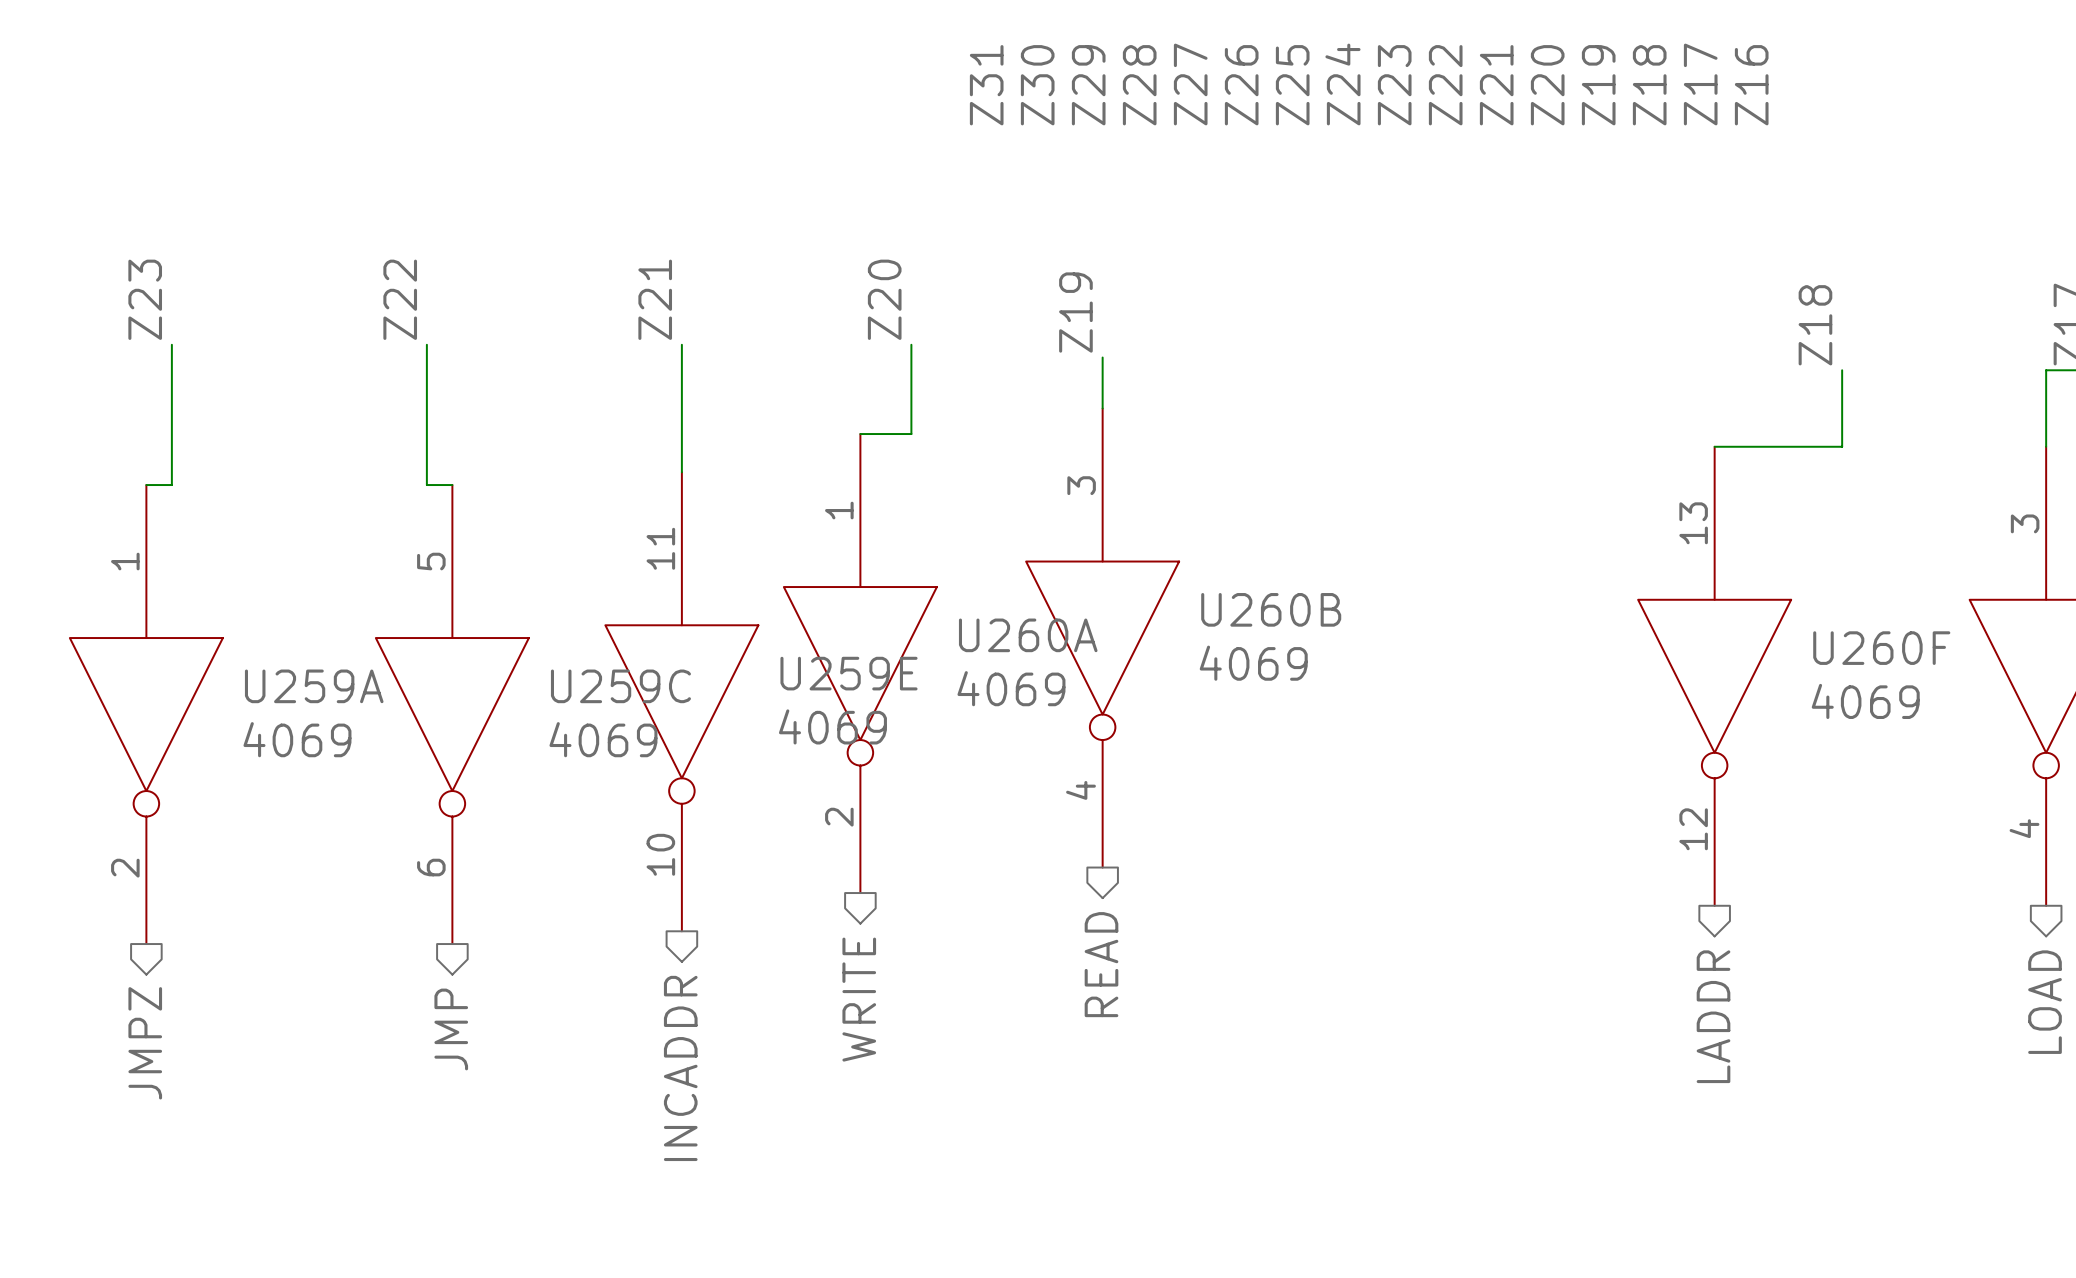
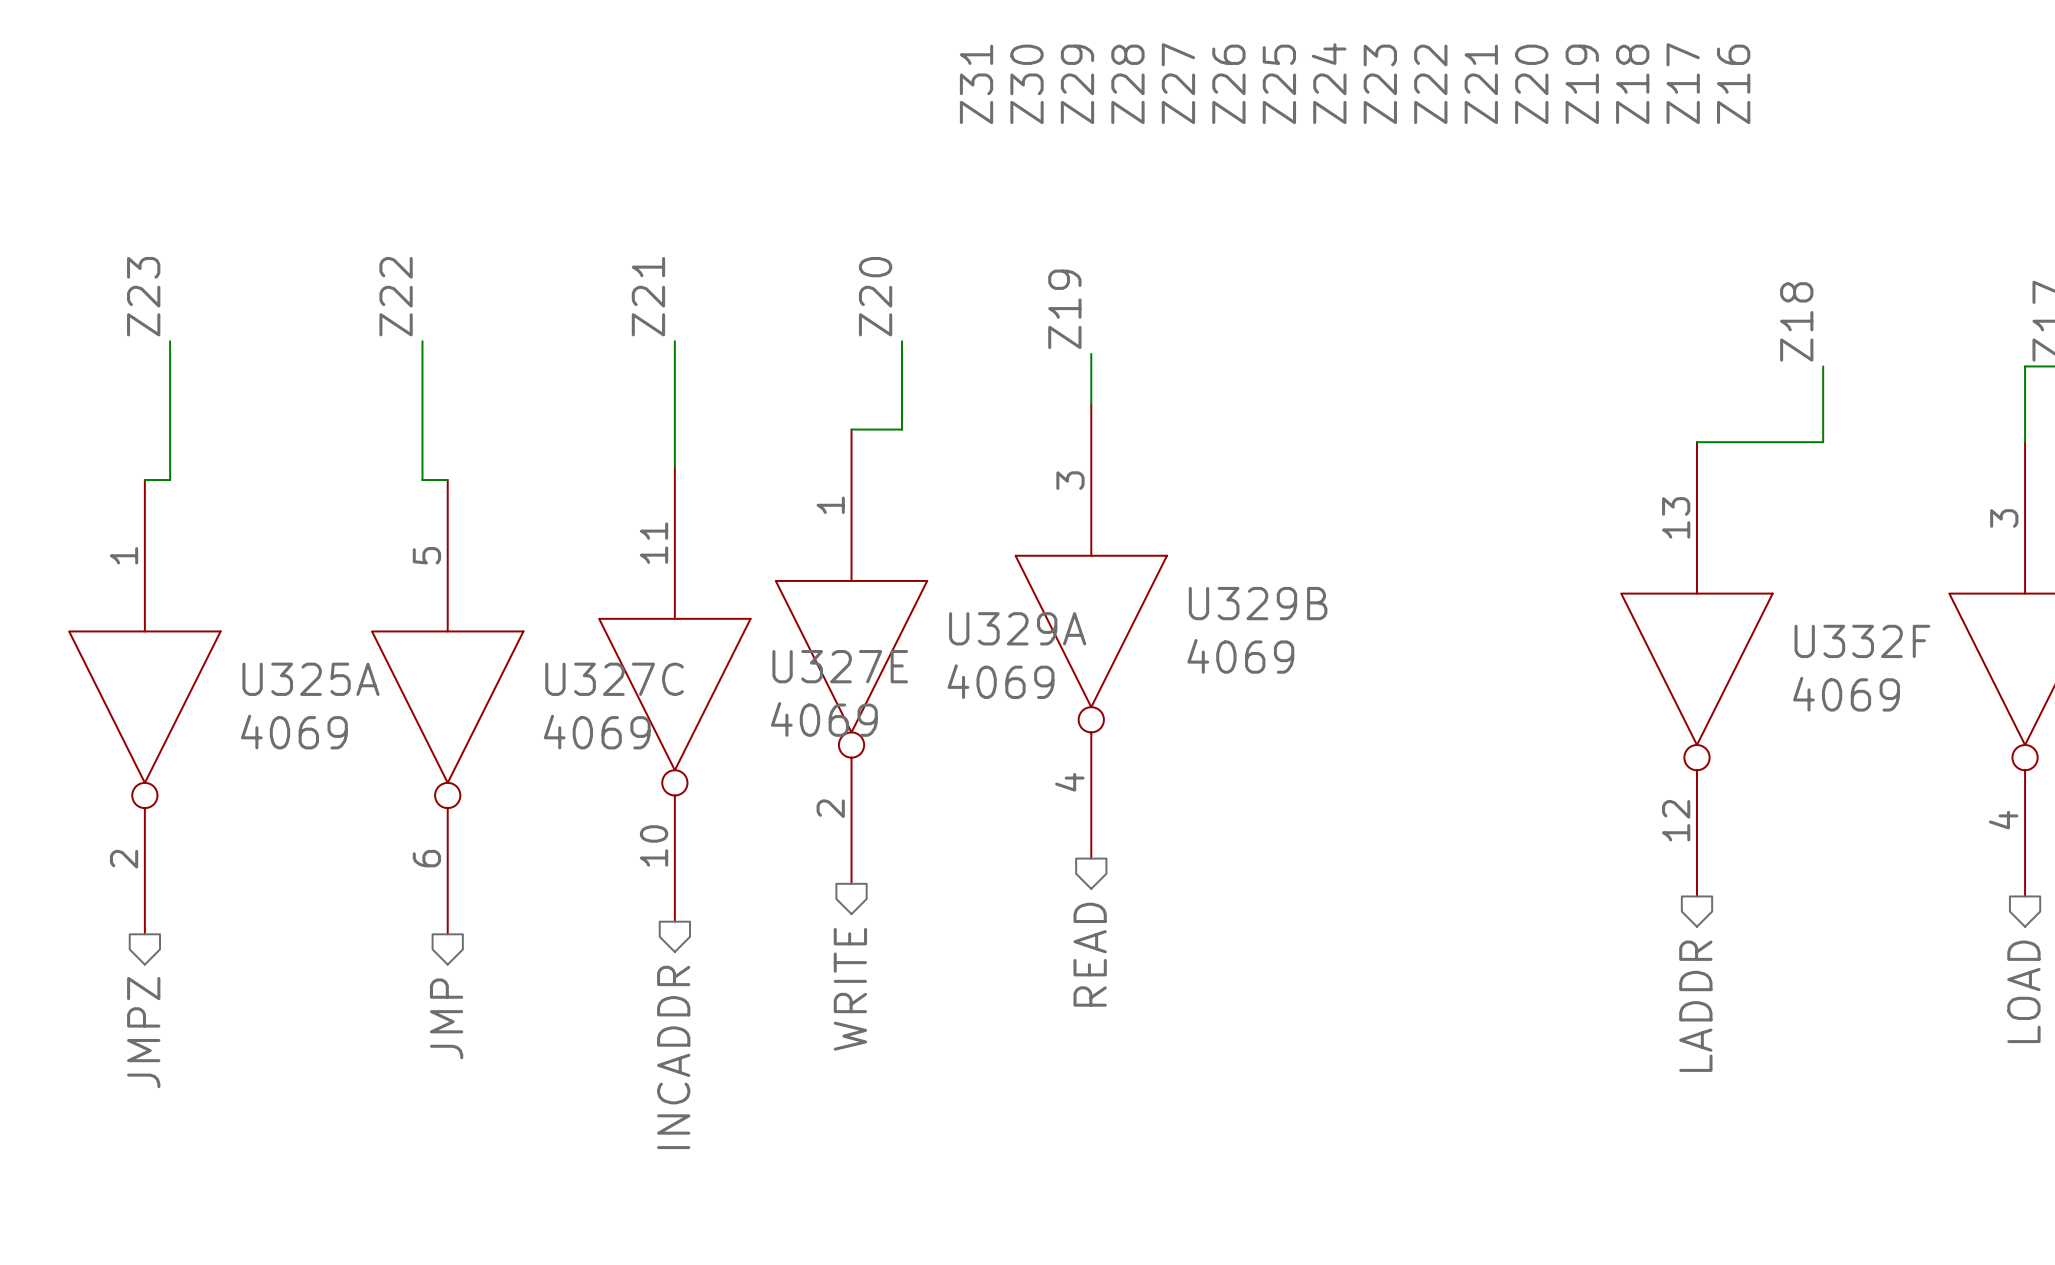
U260B name: U260B (1271, 609) -> U329B (1258, 603)
U260A name: U260A (1028, 635) -> U329A (1017, 628)
U260F name: U260F (1881, 648) -> U332F (1862, 641)
U259E name: U259E (849, 673) -> U327E (840, 666)
U259A name: U259A (314, 686) -> U325A (310, 679)
U259C name: U259C (620, 686) -> U327C (614, 679)

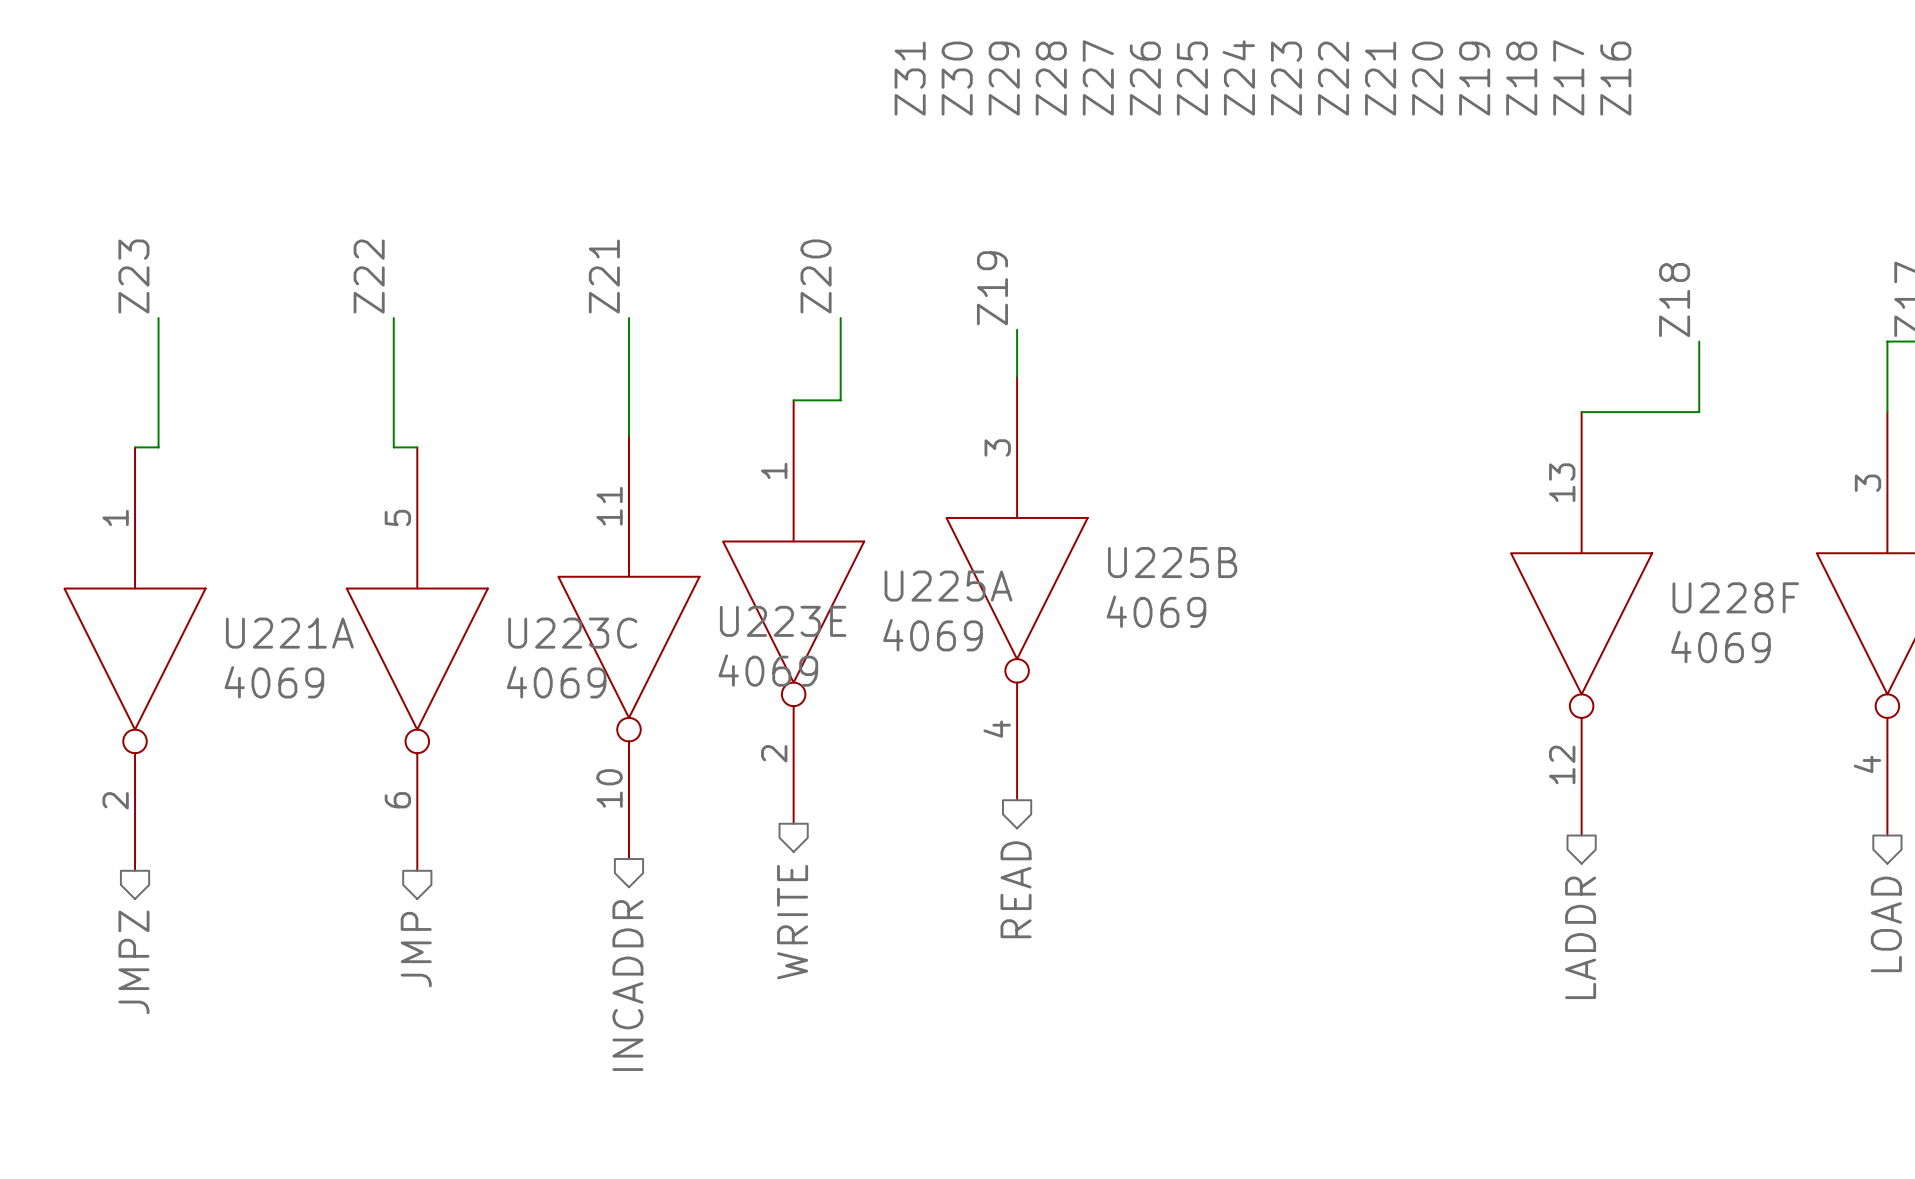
U329B name: U329B (1258, 603) -> U225B (1172, 562)
U329A name: U329A (1017, 628) -> U225A (948, 586)
U332F name: U332F (1862, 641) -> U228F (1735, 597)
U327E name: U327E (840, 666) -> U223E (783, 621)
U325A name: U325A (310, 679) -> U221A (289, 633)
U327C name: U327C (614, 679) -> U223C (572, 633)

